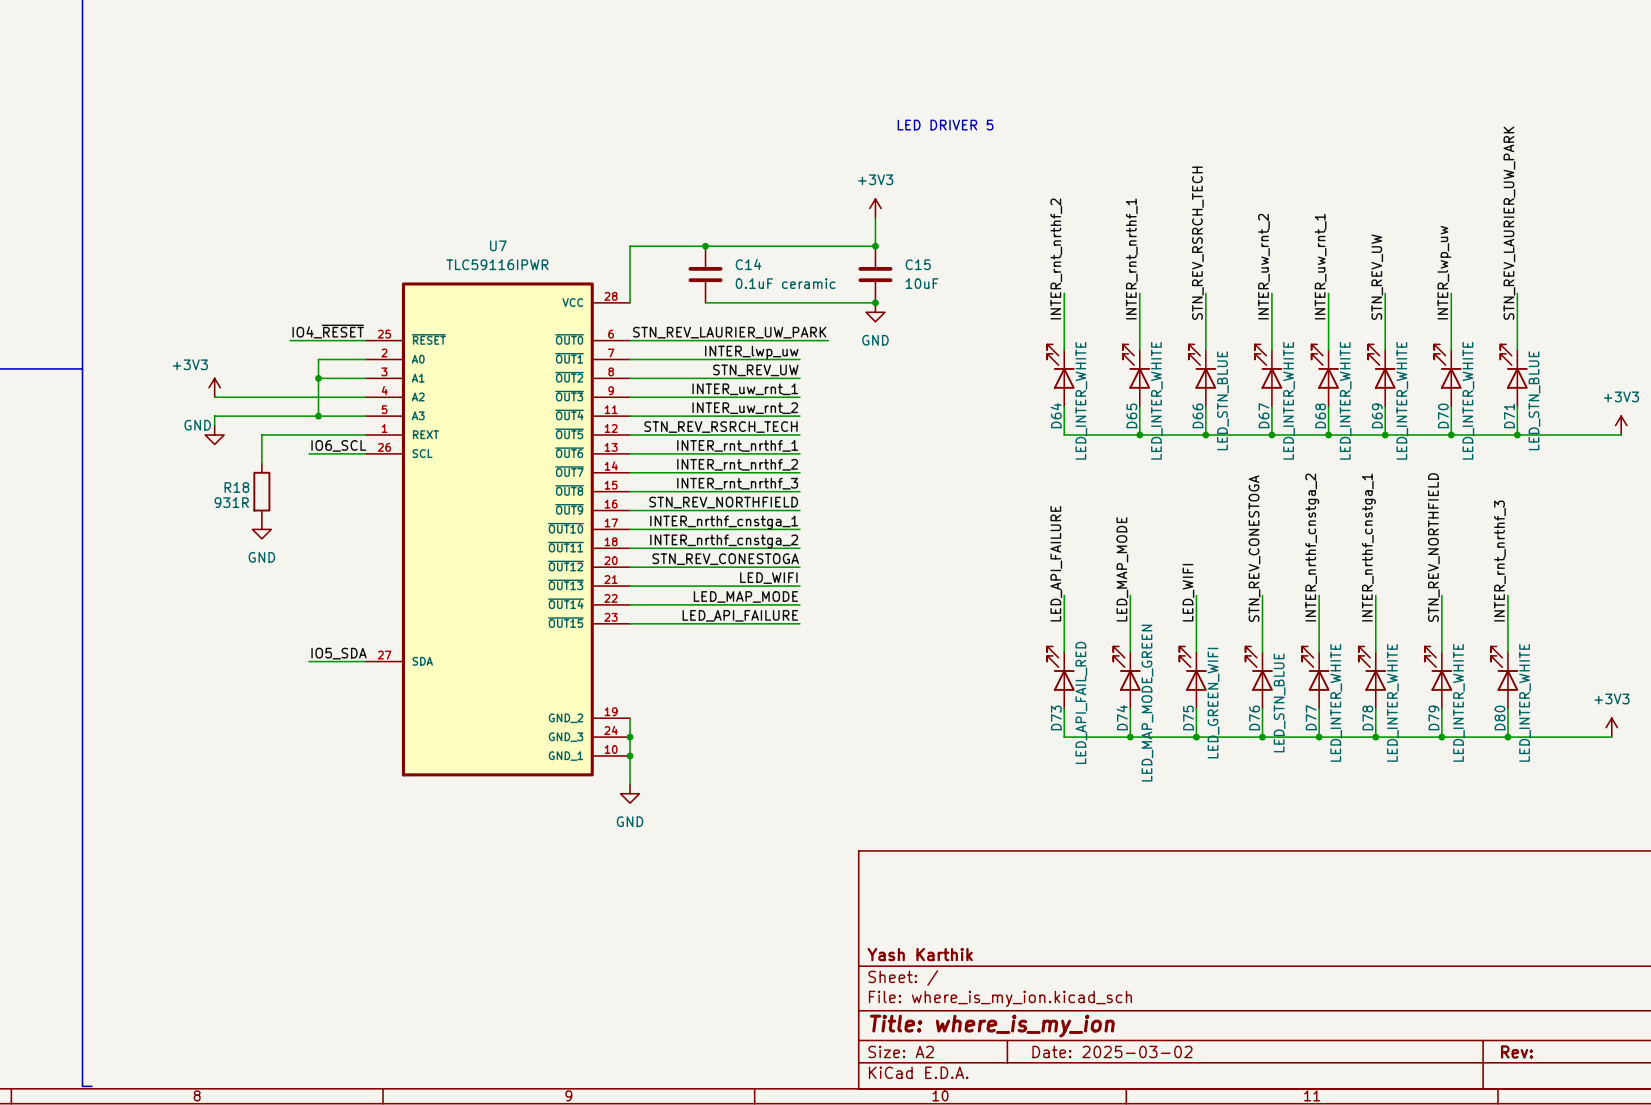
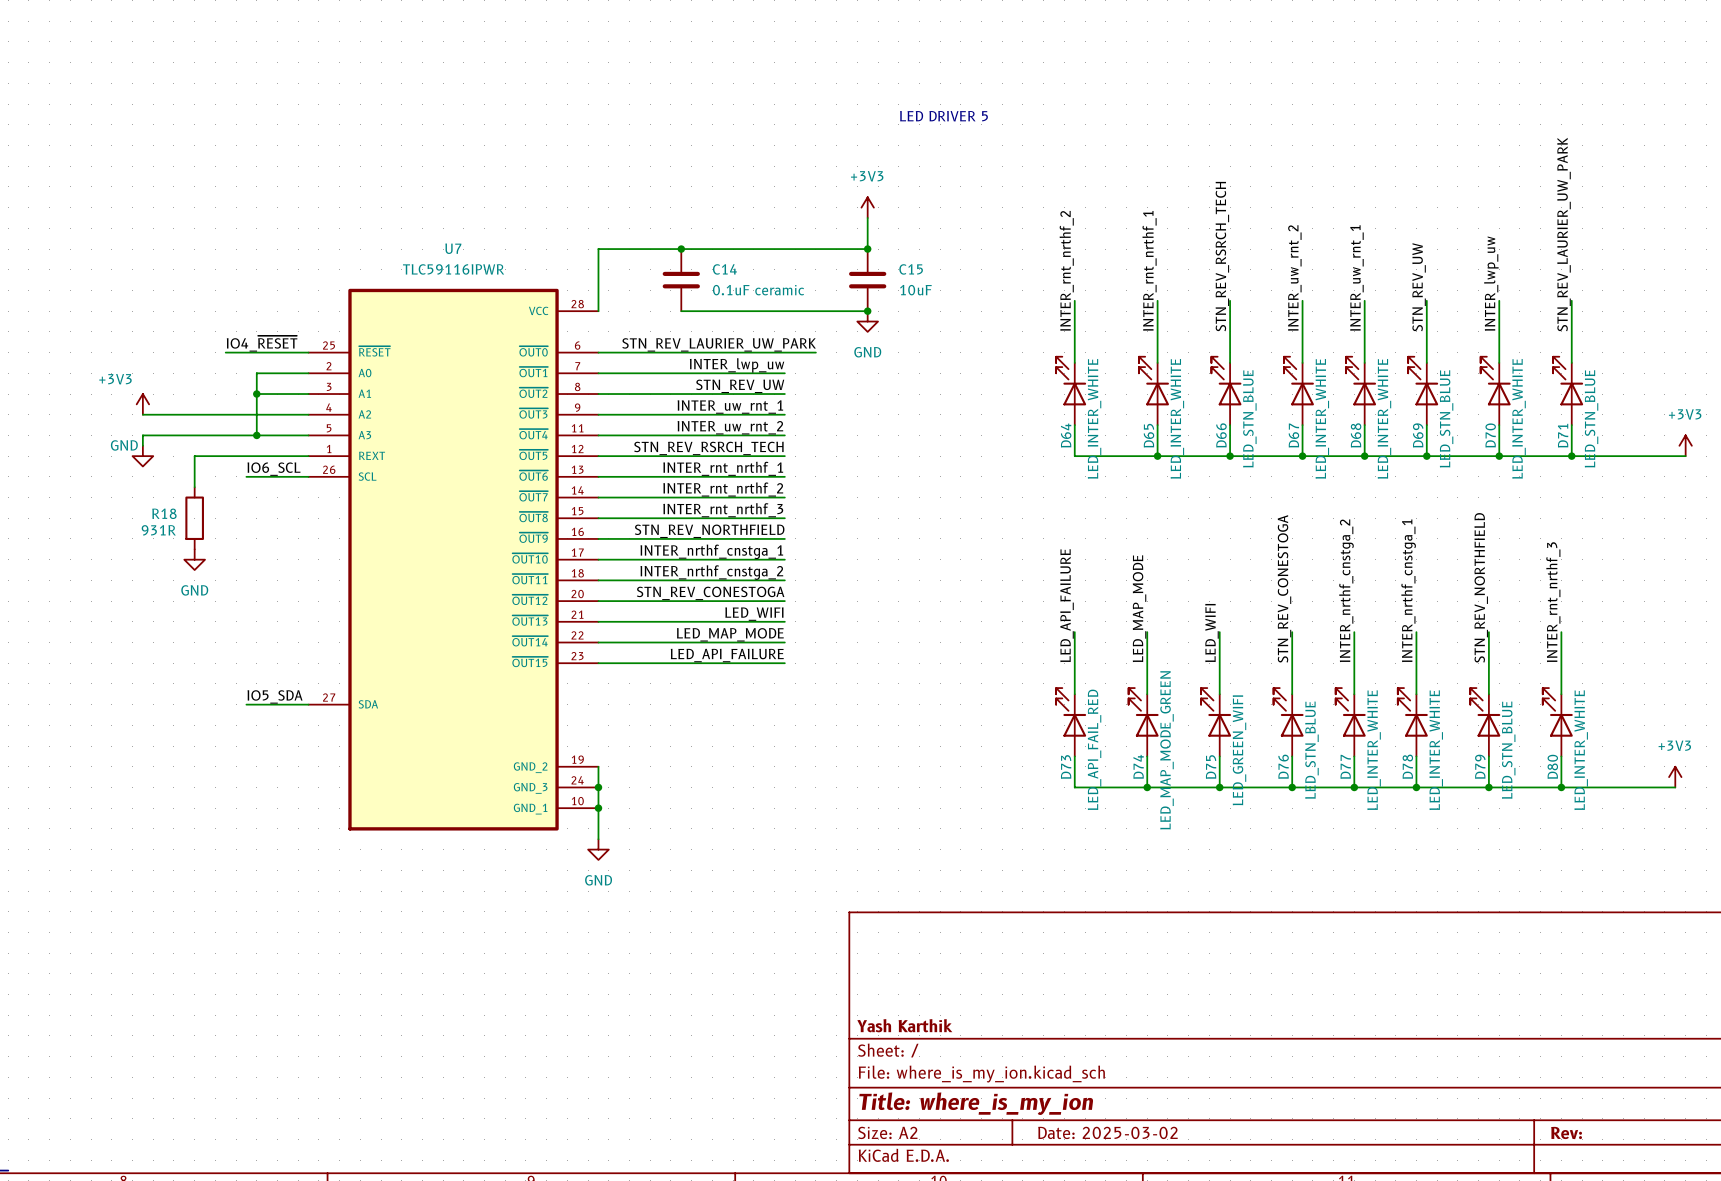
D69 value: LED_INTER_WHITE (1402, 400) -> LED_STN_BLUE (1446, 418)
D79 value: LED_INTER_WHITE (1458, 702) -> LED_STN_BLUE (1508, 750)

